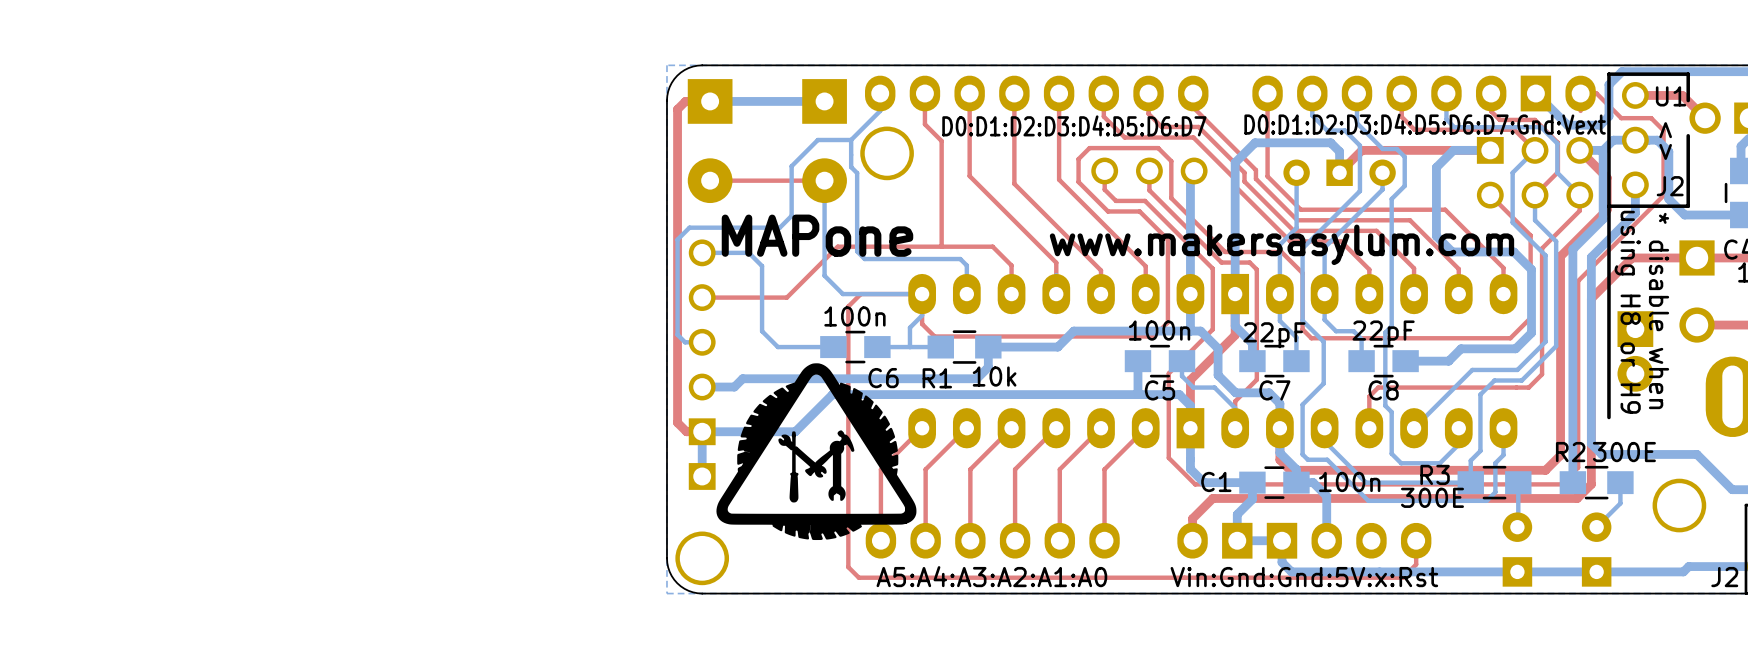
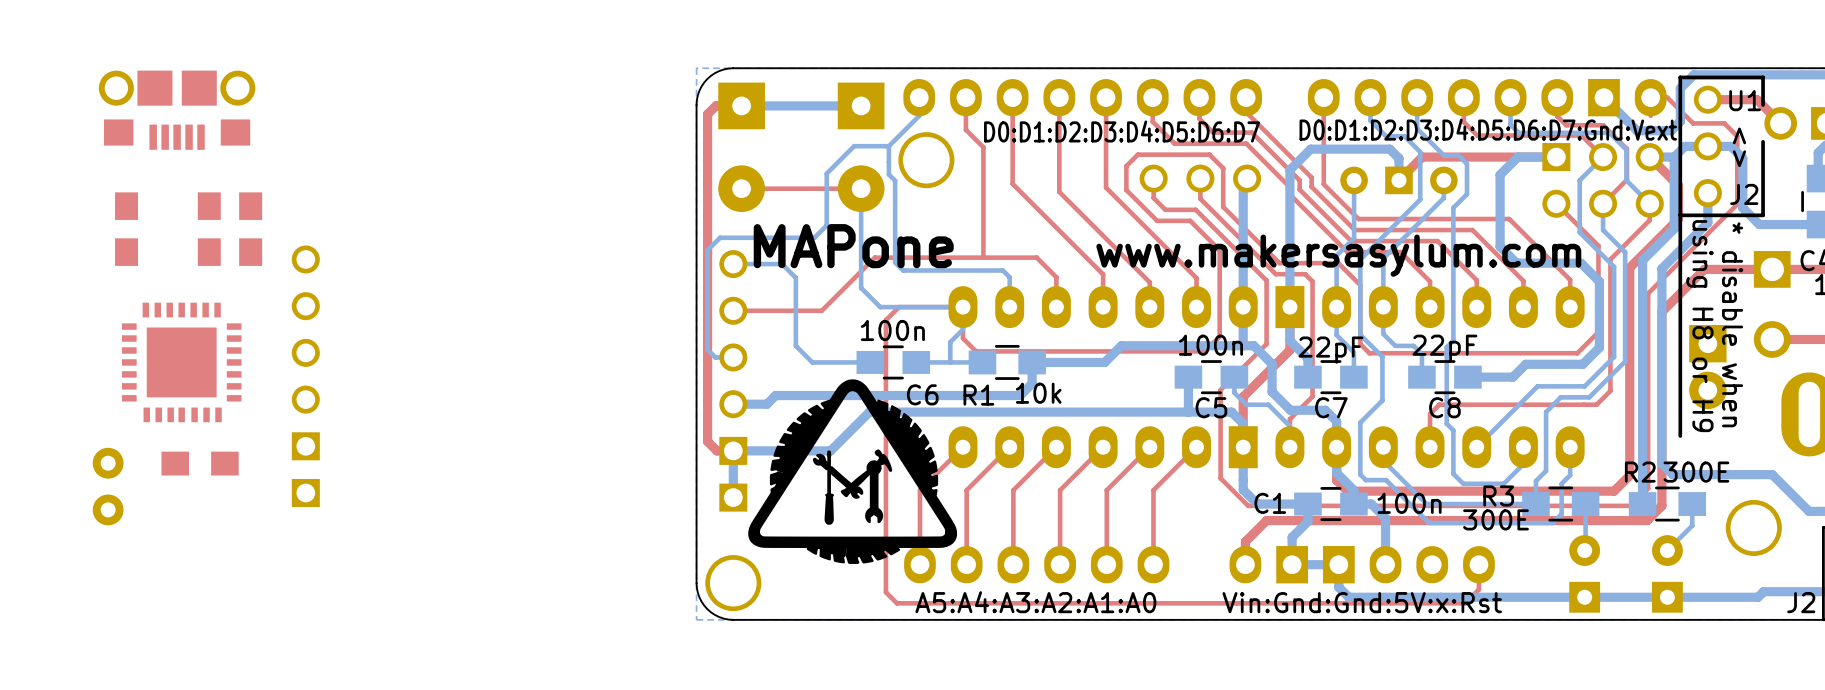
part: none -> (177, 110)
part: none -> (126, 229)
part: none -> (209, 229)
part: none -> (250, 229)
part: none -> (181, 362)
part: none -> (305, 376)
part: none -> (200, 463)
part: none -> (108, 486)

